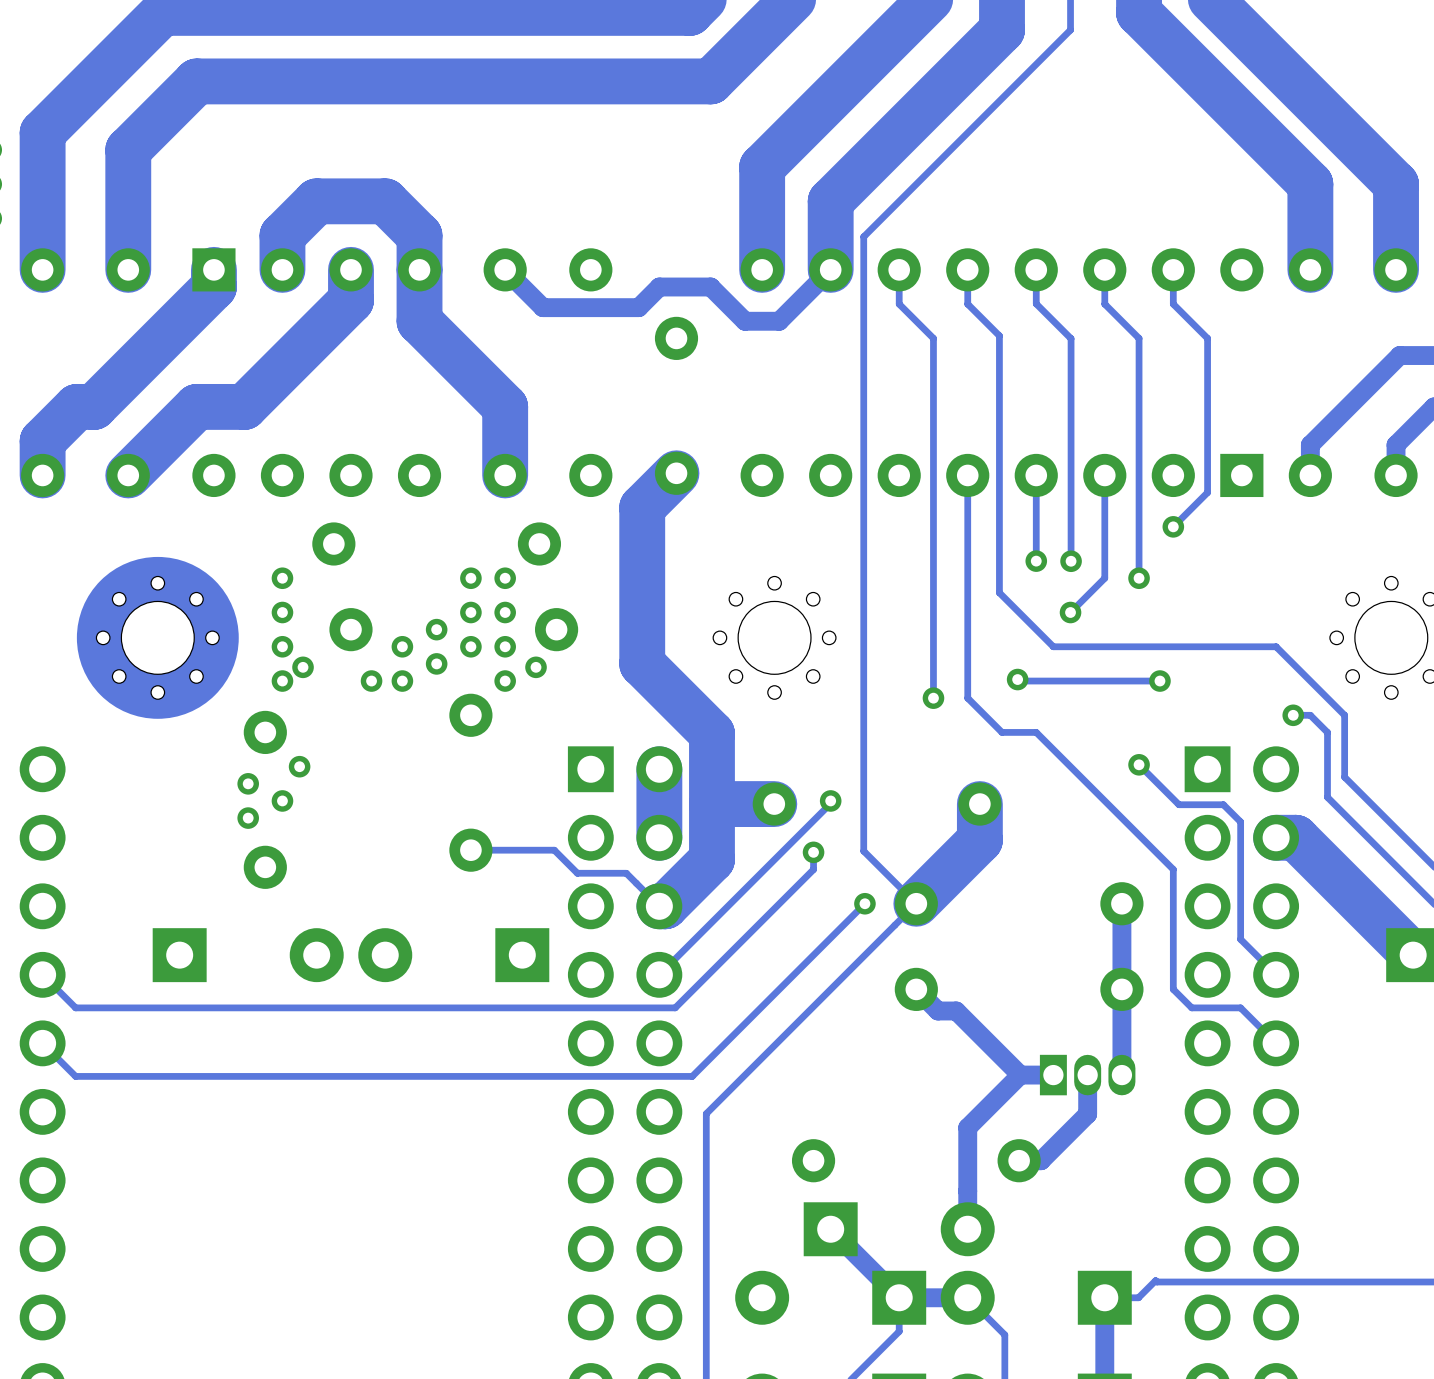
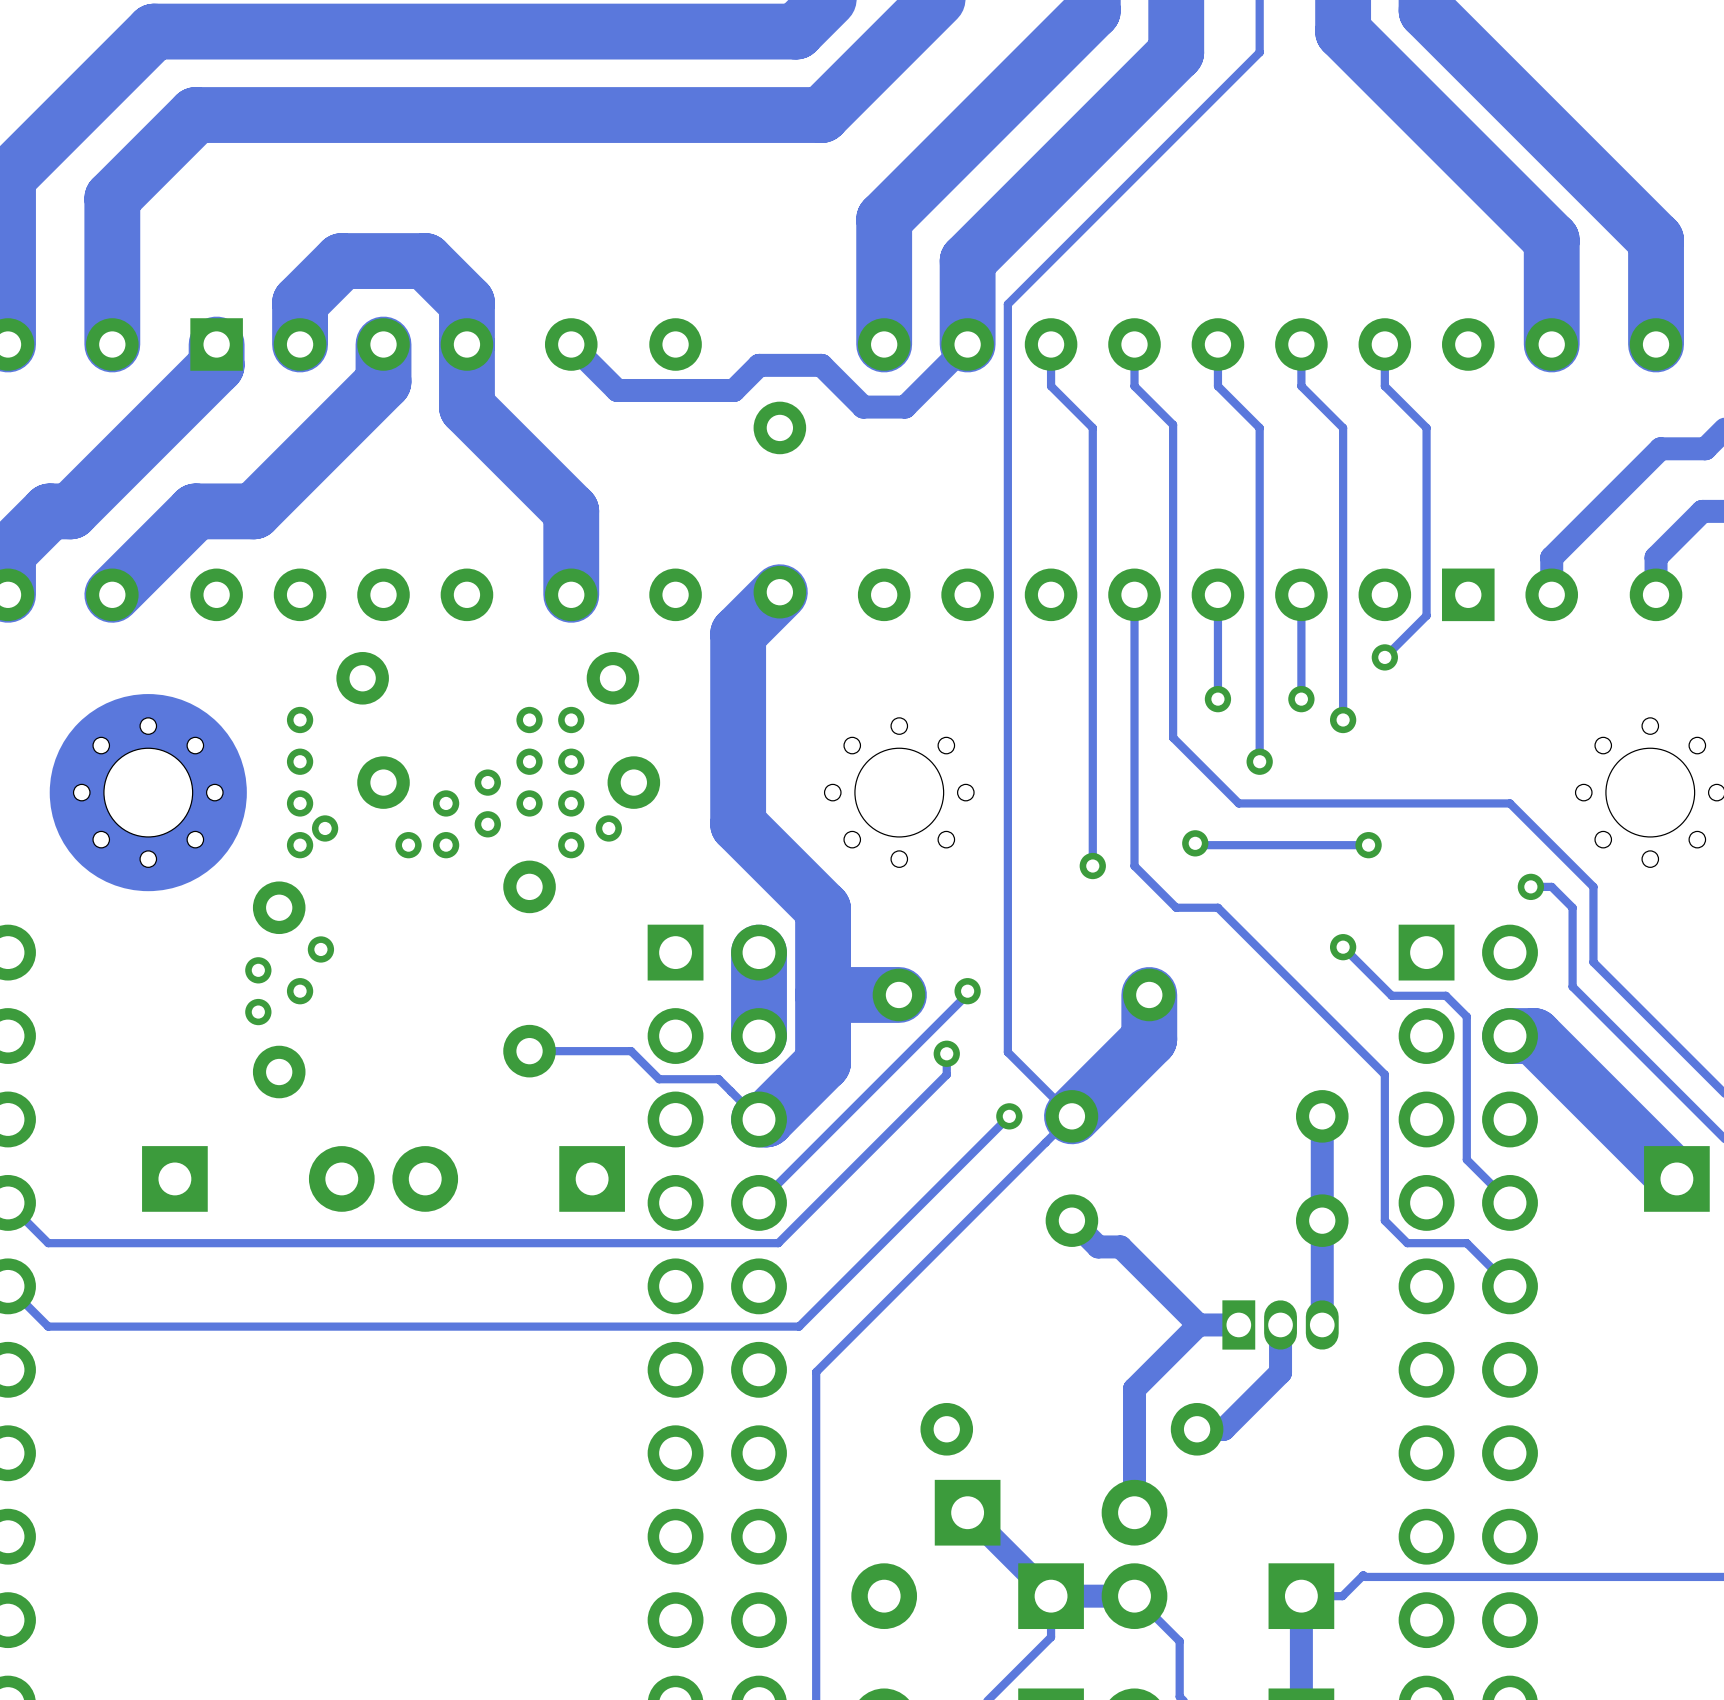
track: (1036, 303) (1071, 338) (1071, 561) -> (1217, 386) (1259, 427) (1259, 761)
via position: (1071, 561) -> (1301, 699)
track: (1104, 561) (1104, 578) (1070, 612) -> none

